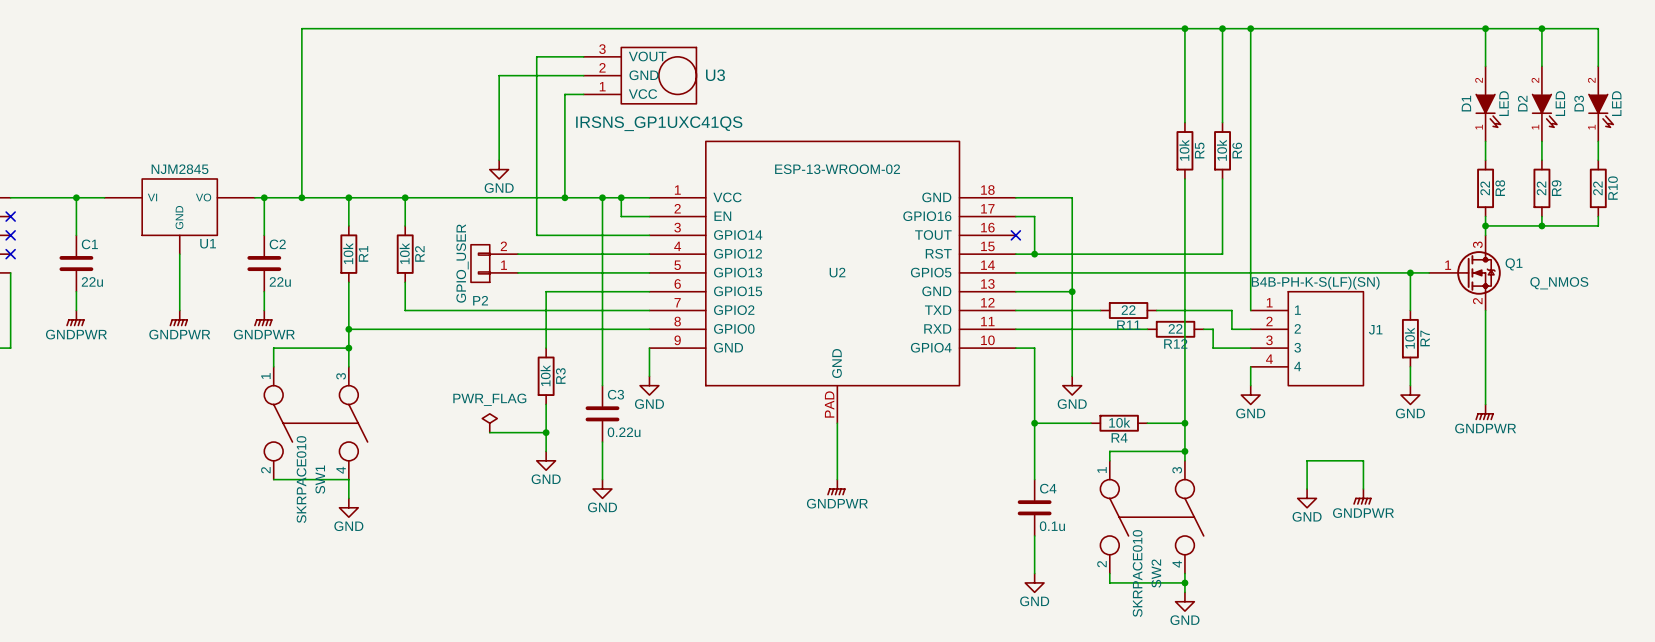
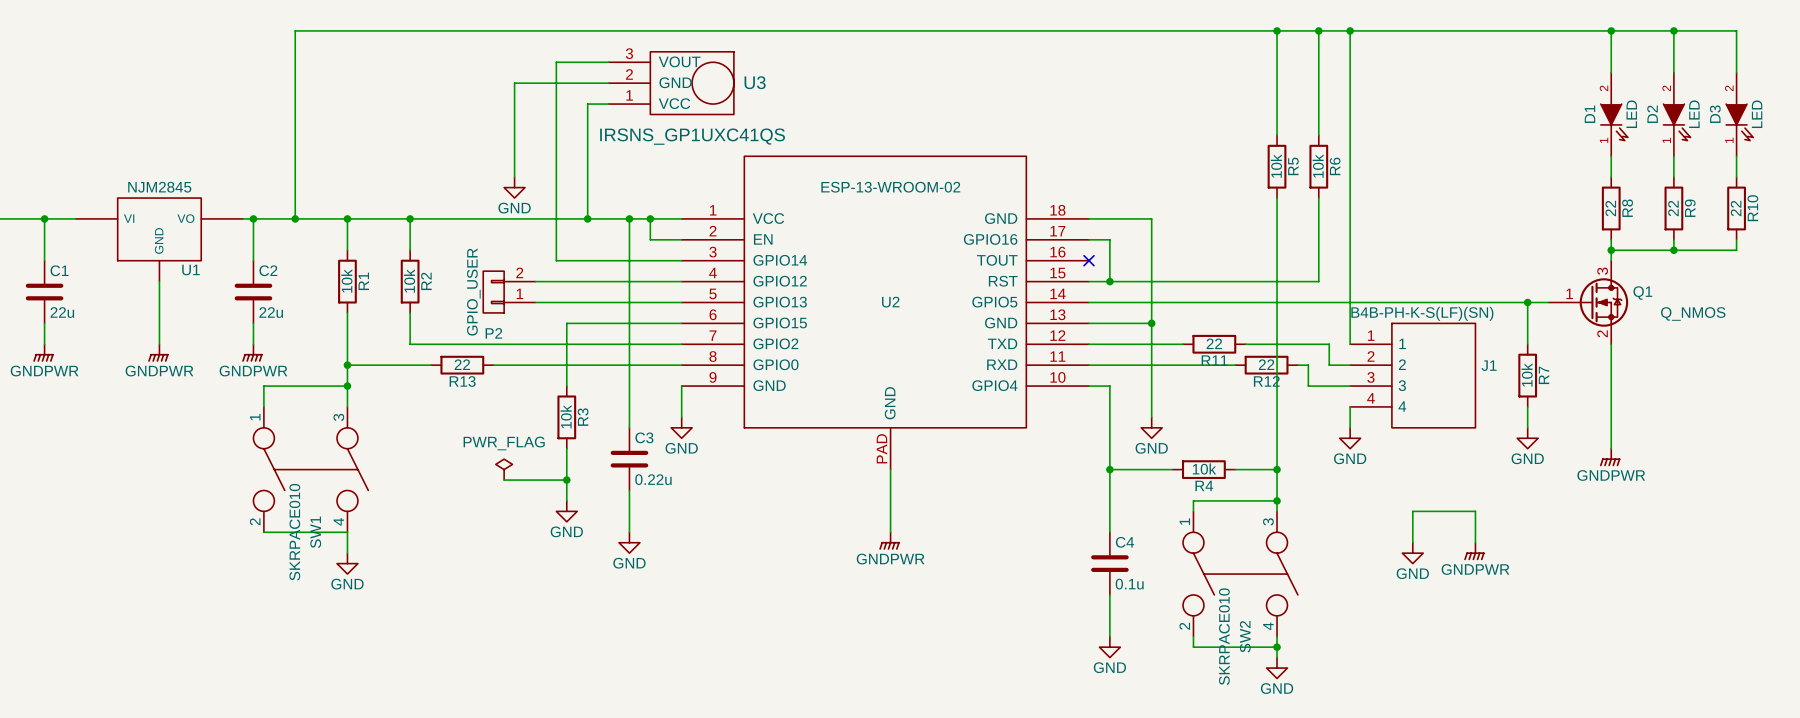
wire: (424, 329) (480, 329) -> none
R13: none -> 22 (462, 365)

